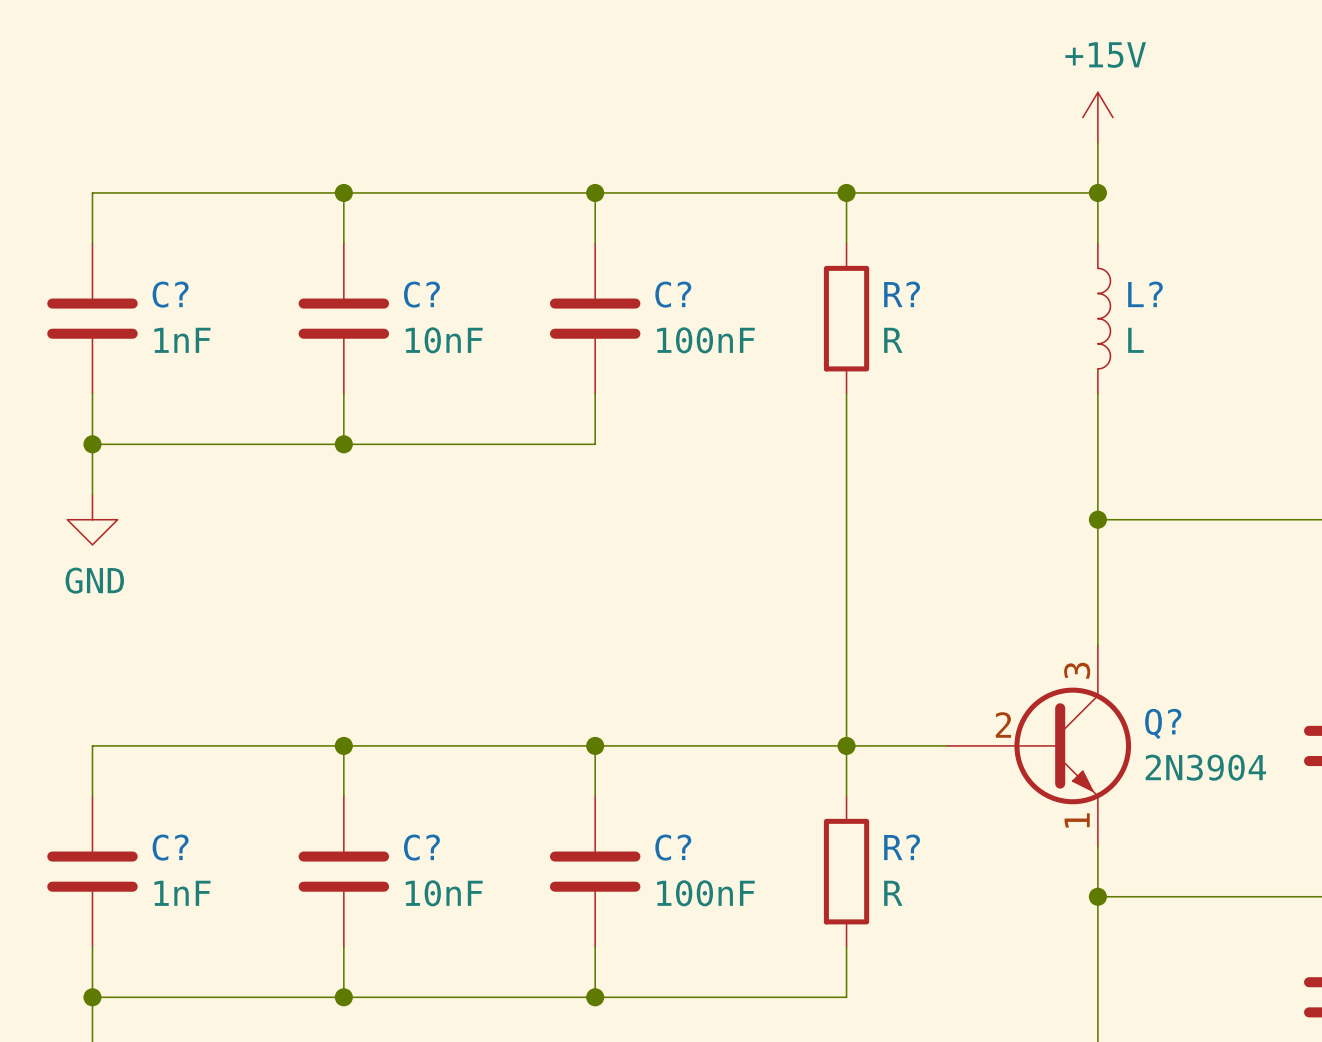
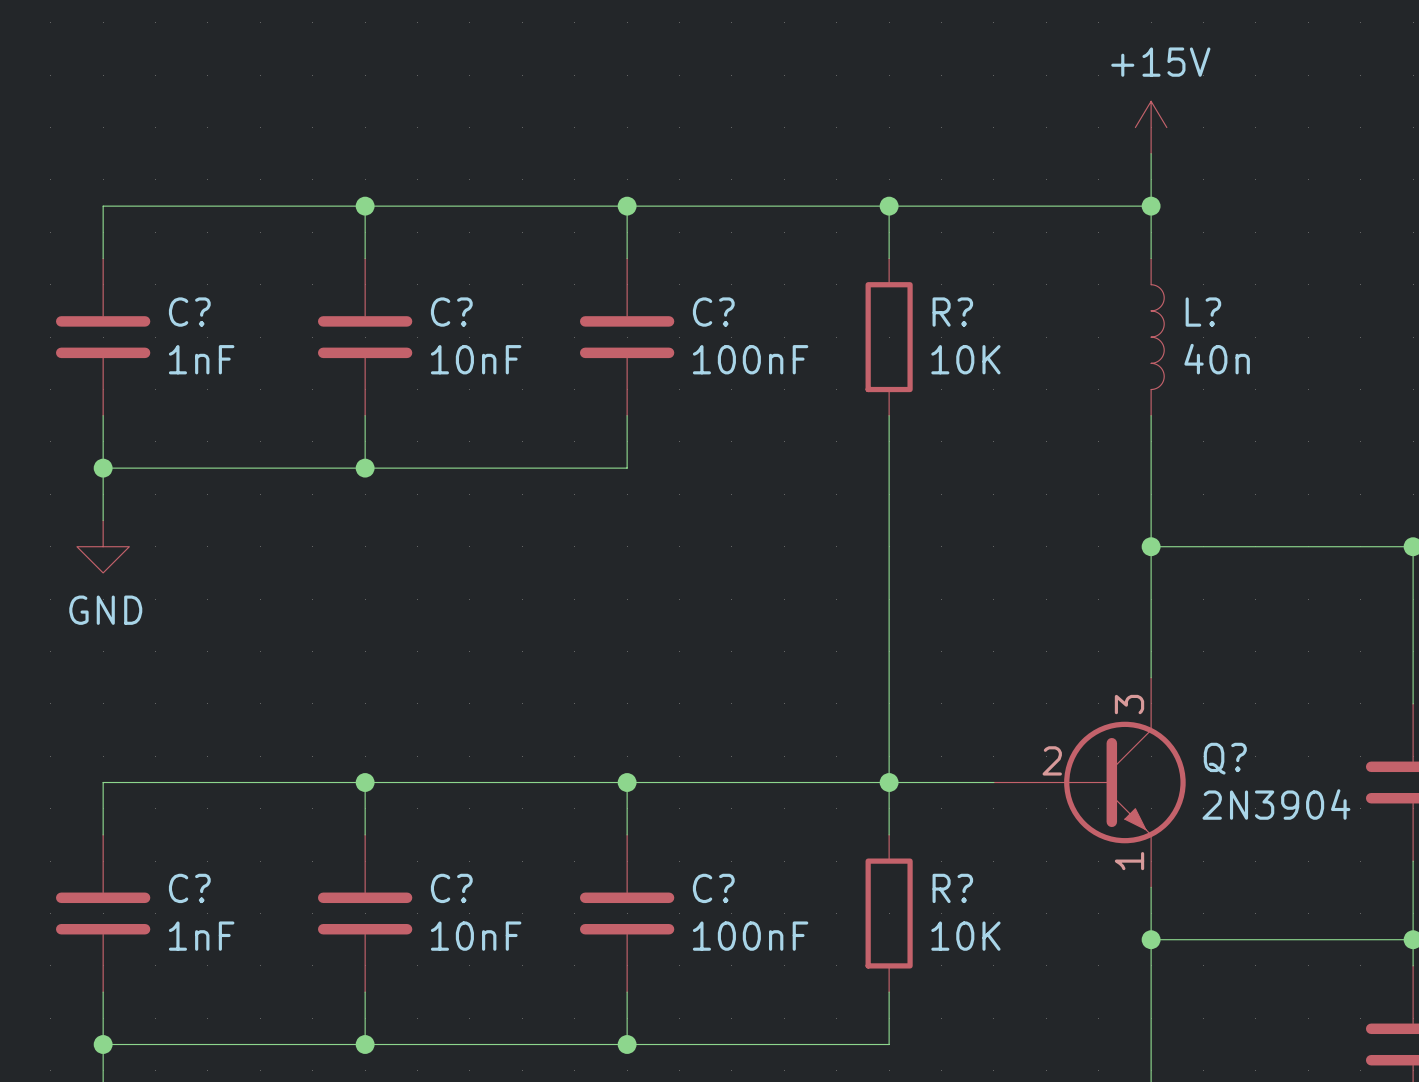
R? value: R (893, 340) -> 10K (965, 359)
L? value: L (1135, 340) -> 40n (1217, 359)
R? value: R (893, 893) -> 10K (965, 936)

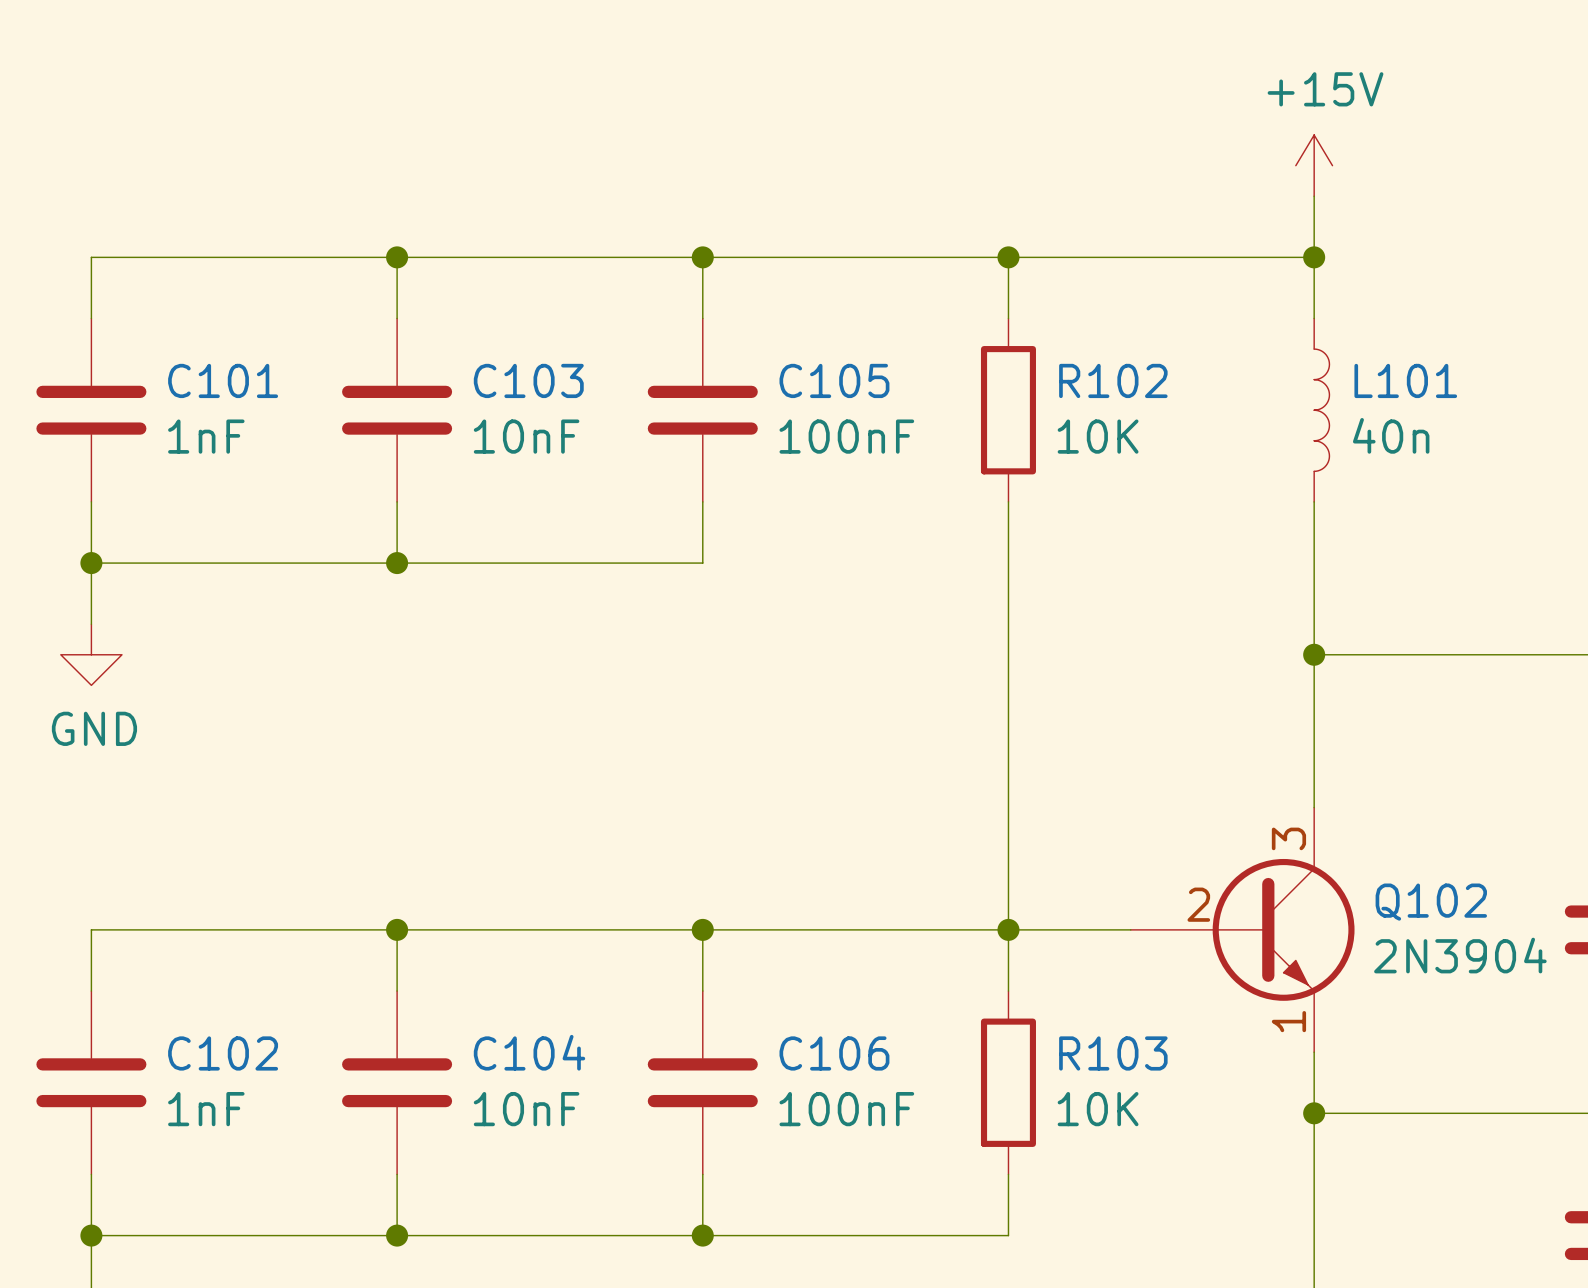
C? name: C? (189, 312) -> C101 (223, 380)
C? name: C? (451, 312) -> C103 (528, 380)
C? name: C? (713, 312) -> C105 (834, 380)
R? name: R? (952, 312) -> R102 (1113, 380)
L? name: L? (1203, 312) -> L101 (1405, 380)
Q? name: Q? (1225, 758) -> Q102 (1431, 902)
C? name: C? (189, 888) -> C102 (223, 1053)
C? name: C? (451, 888) -> C104 (529, 1052)
C? name: C? (713, 888) -> C106 (834, 1053)
R? name: R? (952, 888) -> R103 (1113, 1053)

